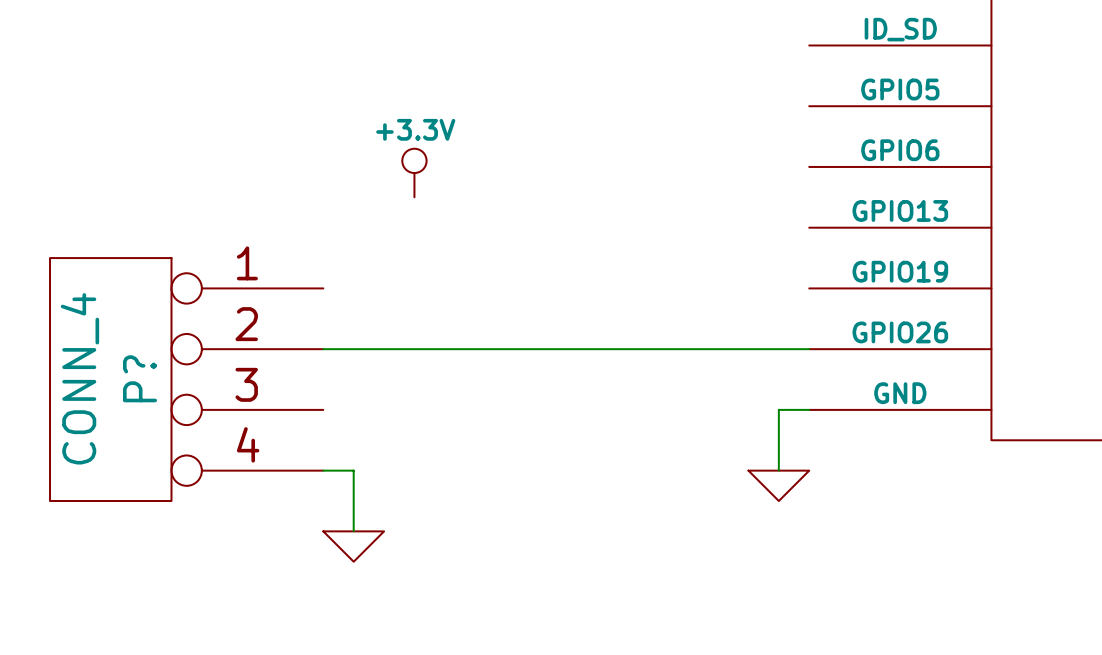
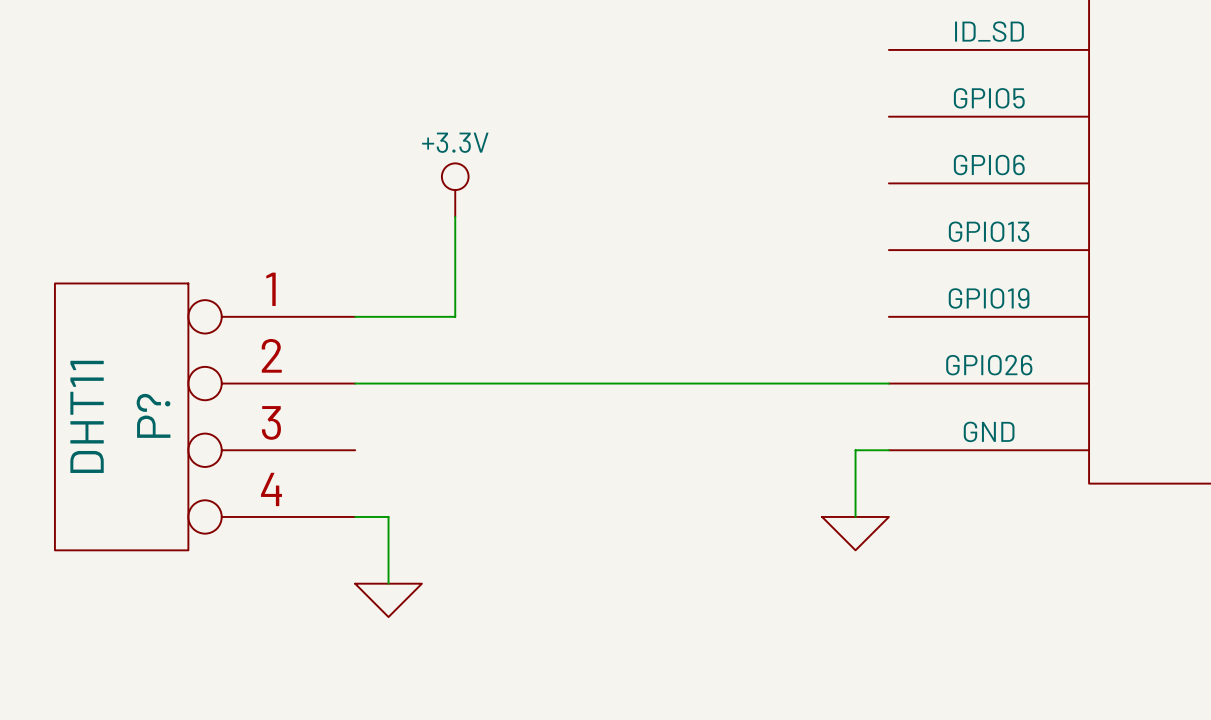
wire: none -> (455, 216) (455, 316) (355, 316)
P? value: CONN_4 (79, 378) -> DHT11 (87, 416)

